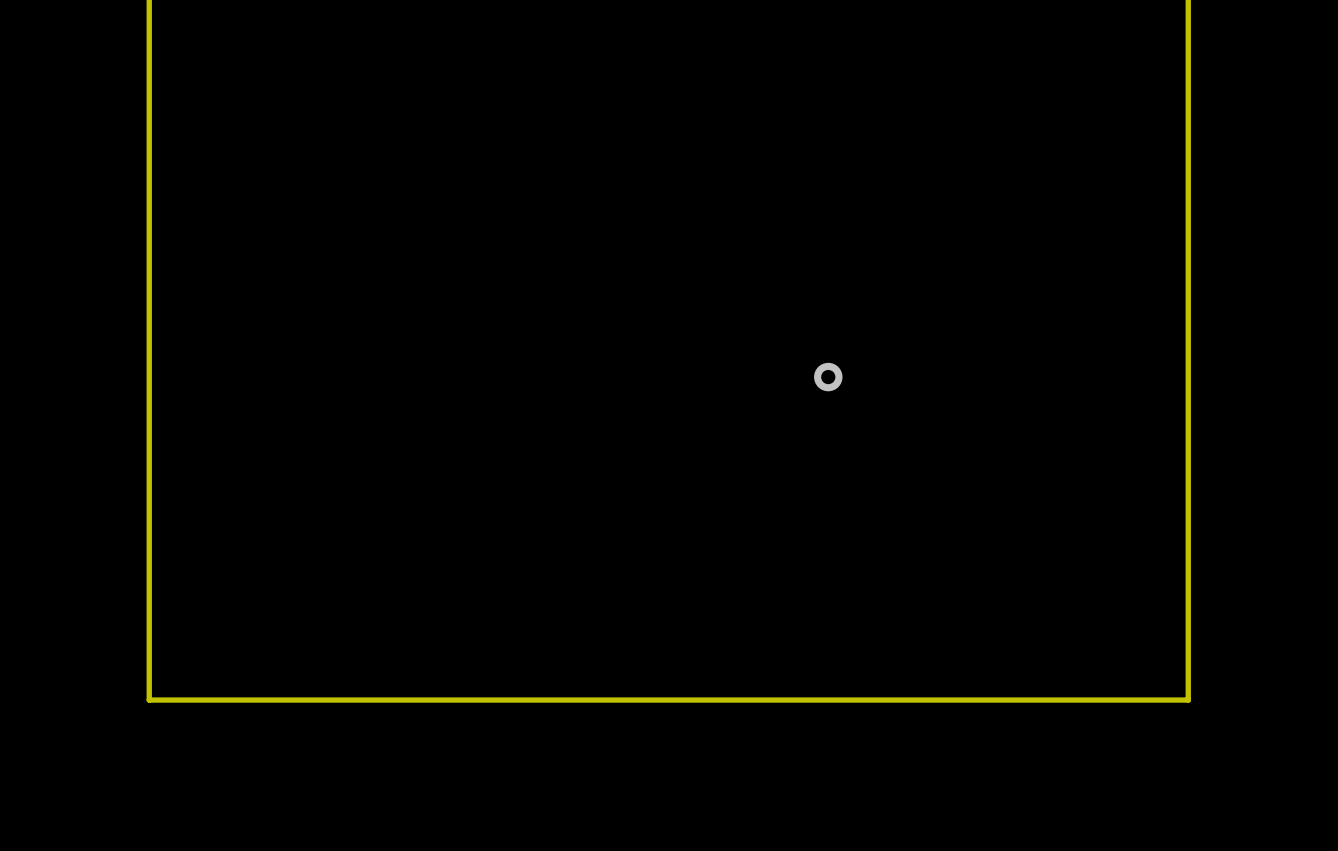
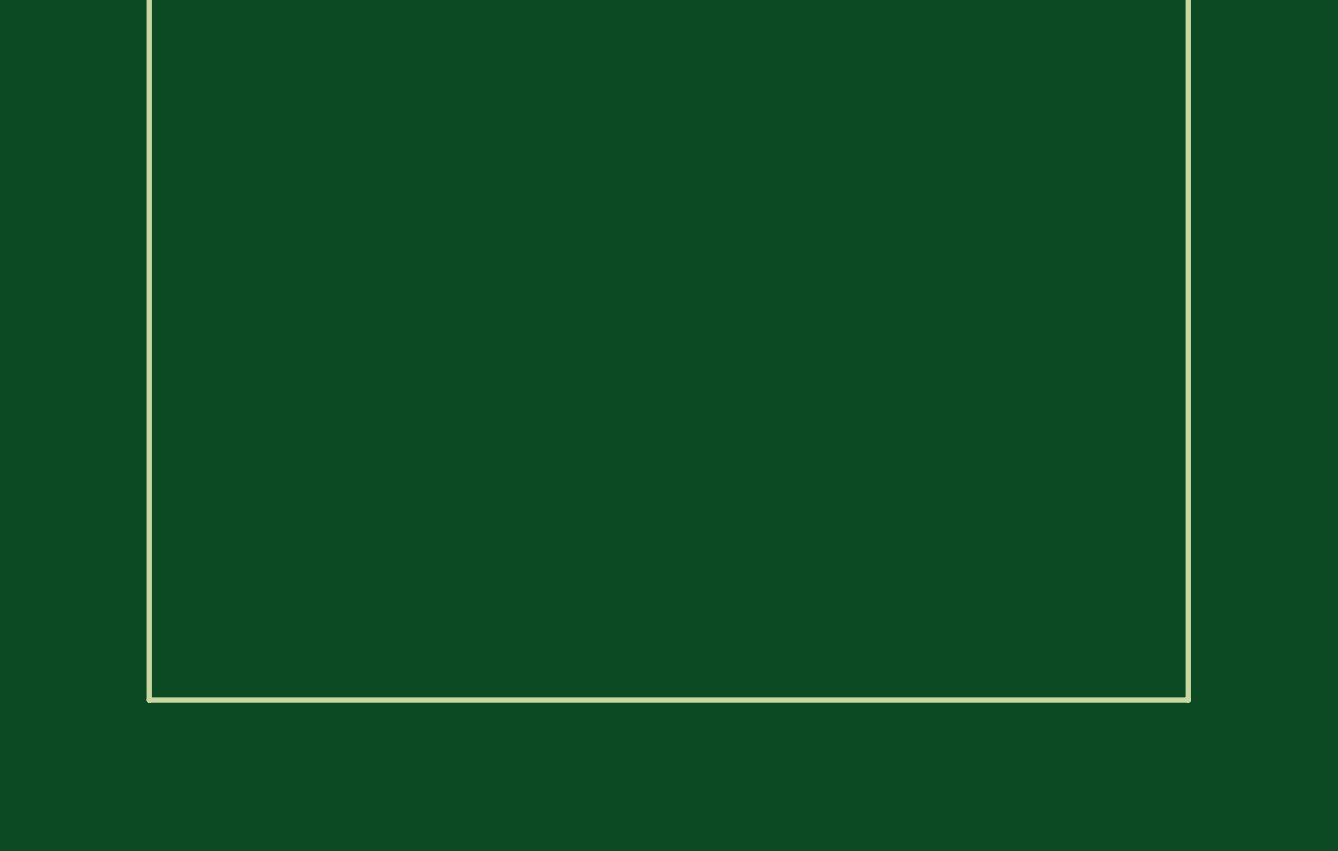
via: (828, 377) -> none

